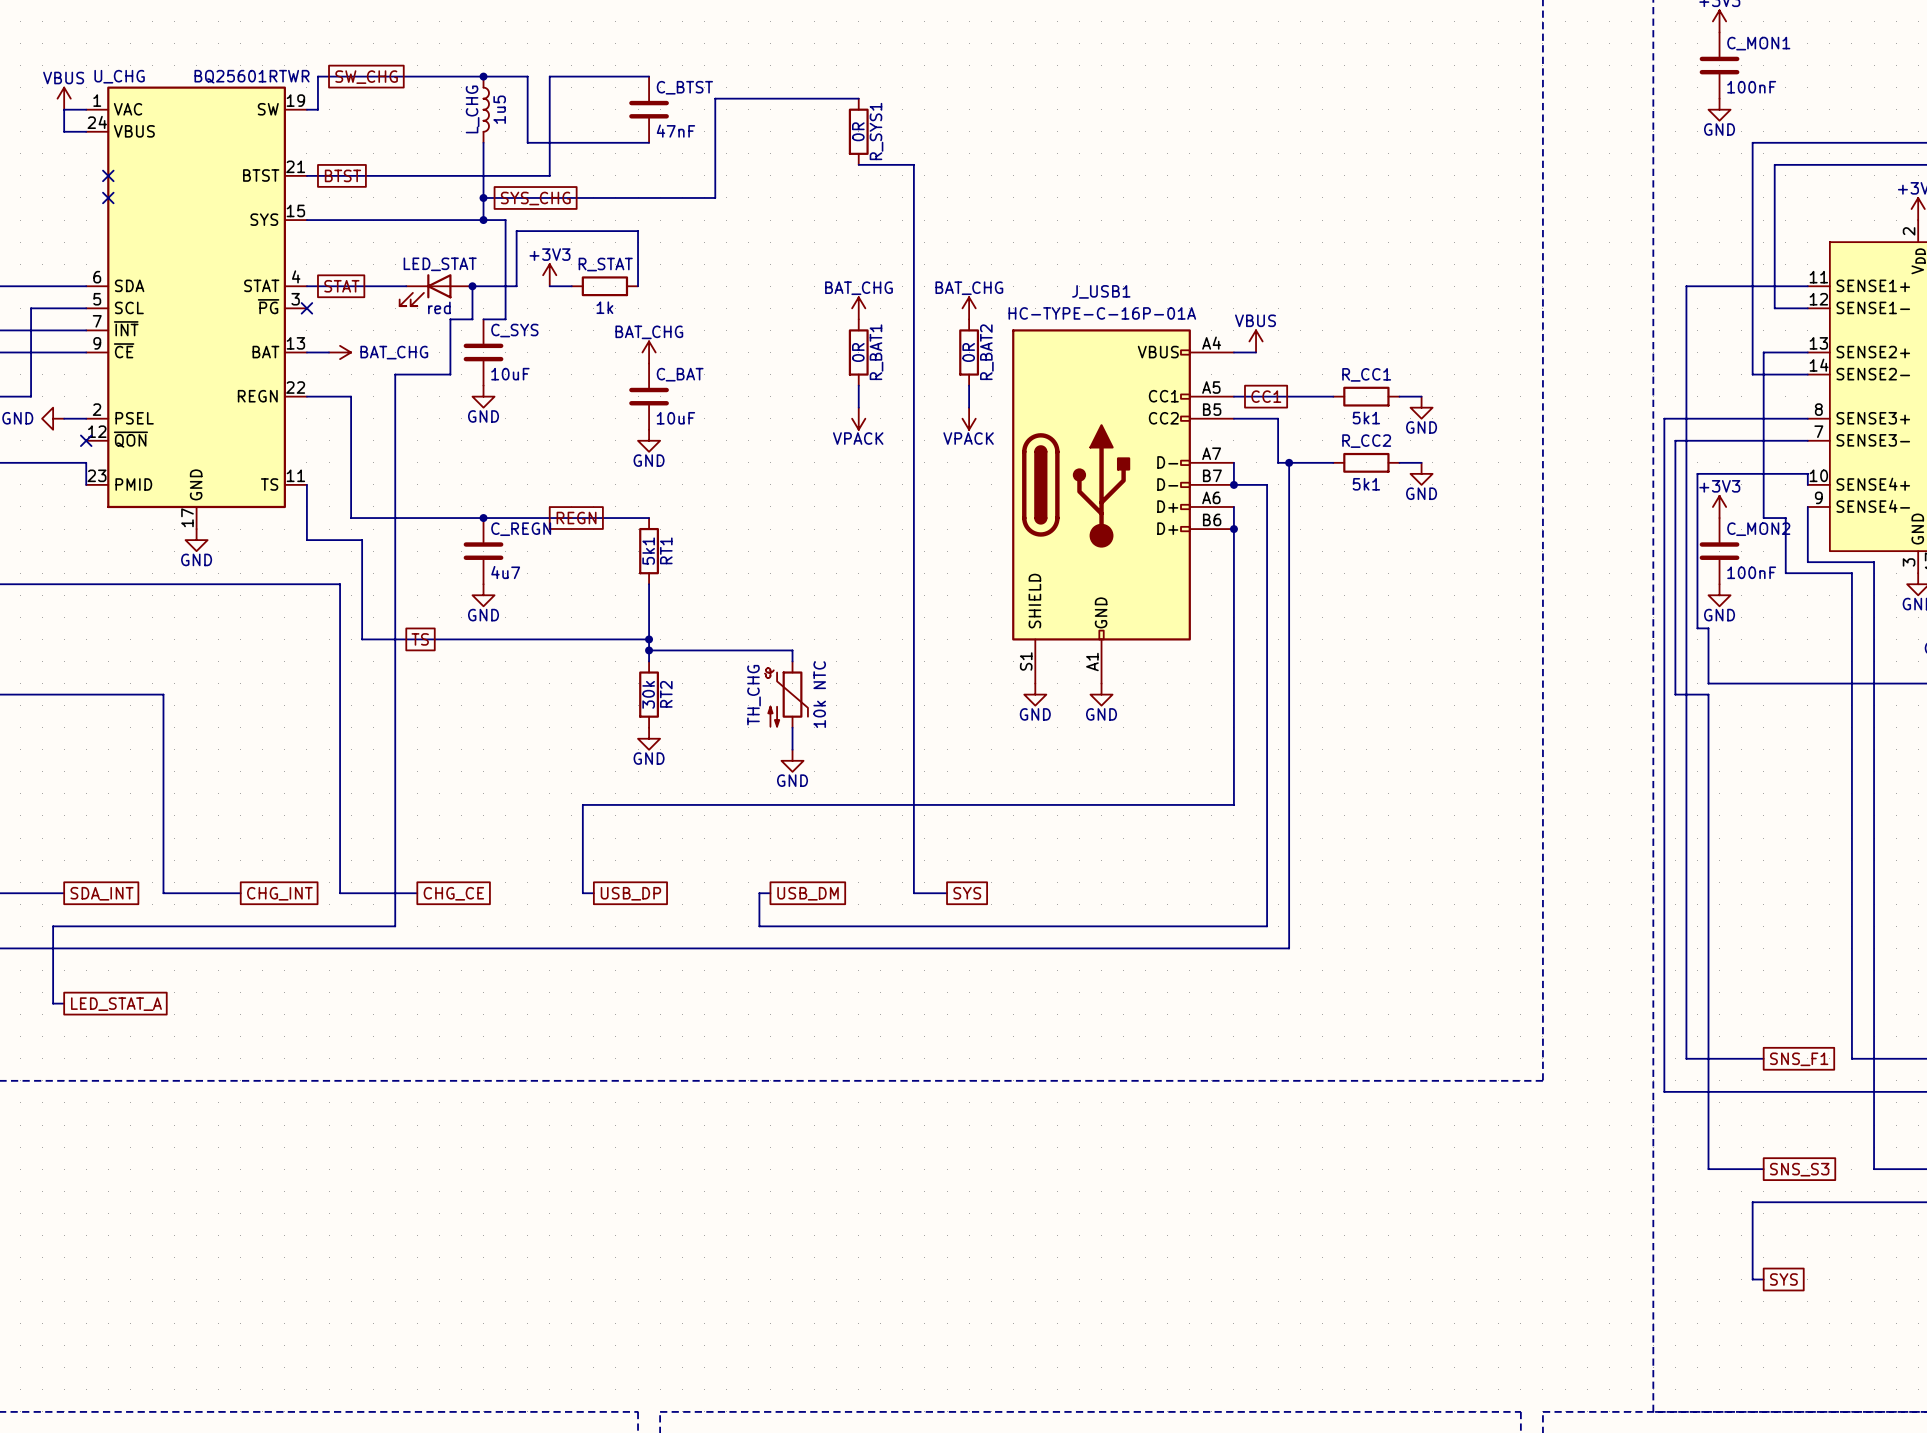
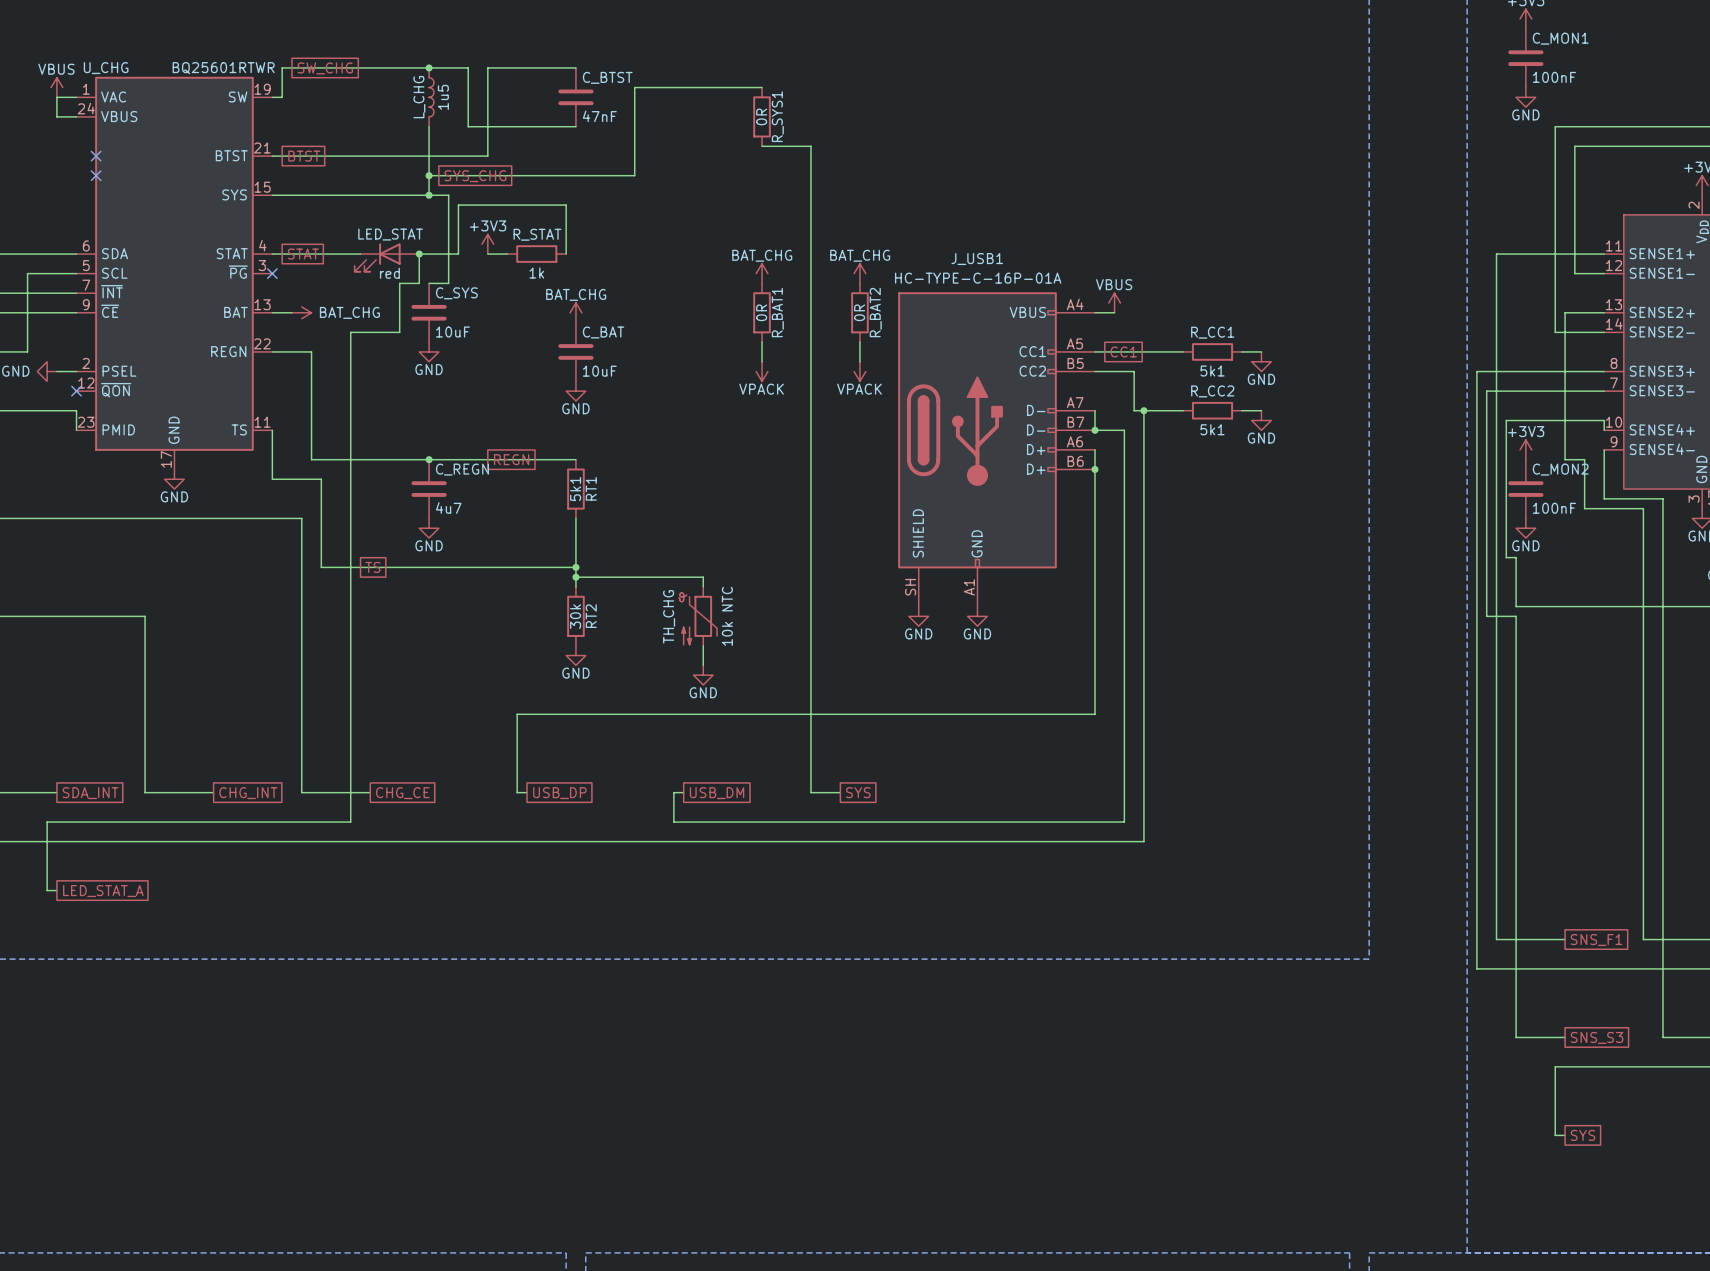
J_USB1 pin number: S1 (1026, 661) -> SH (910, 587)

